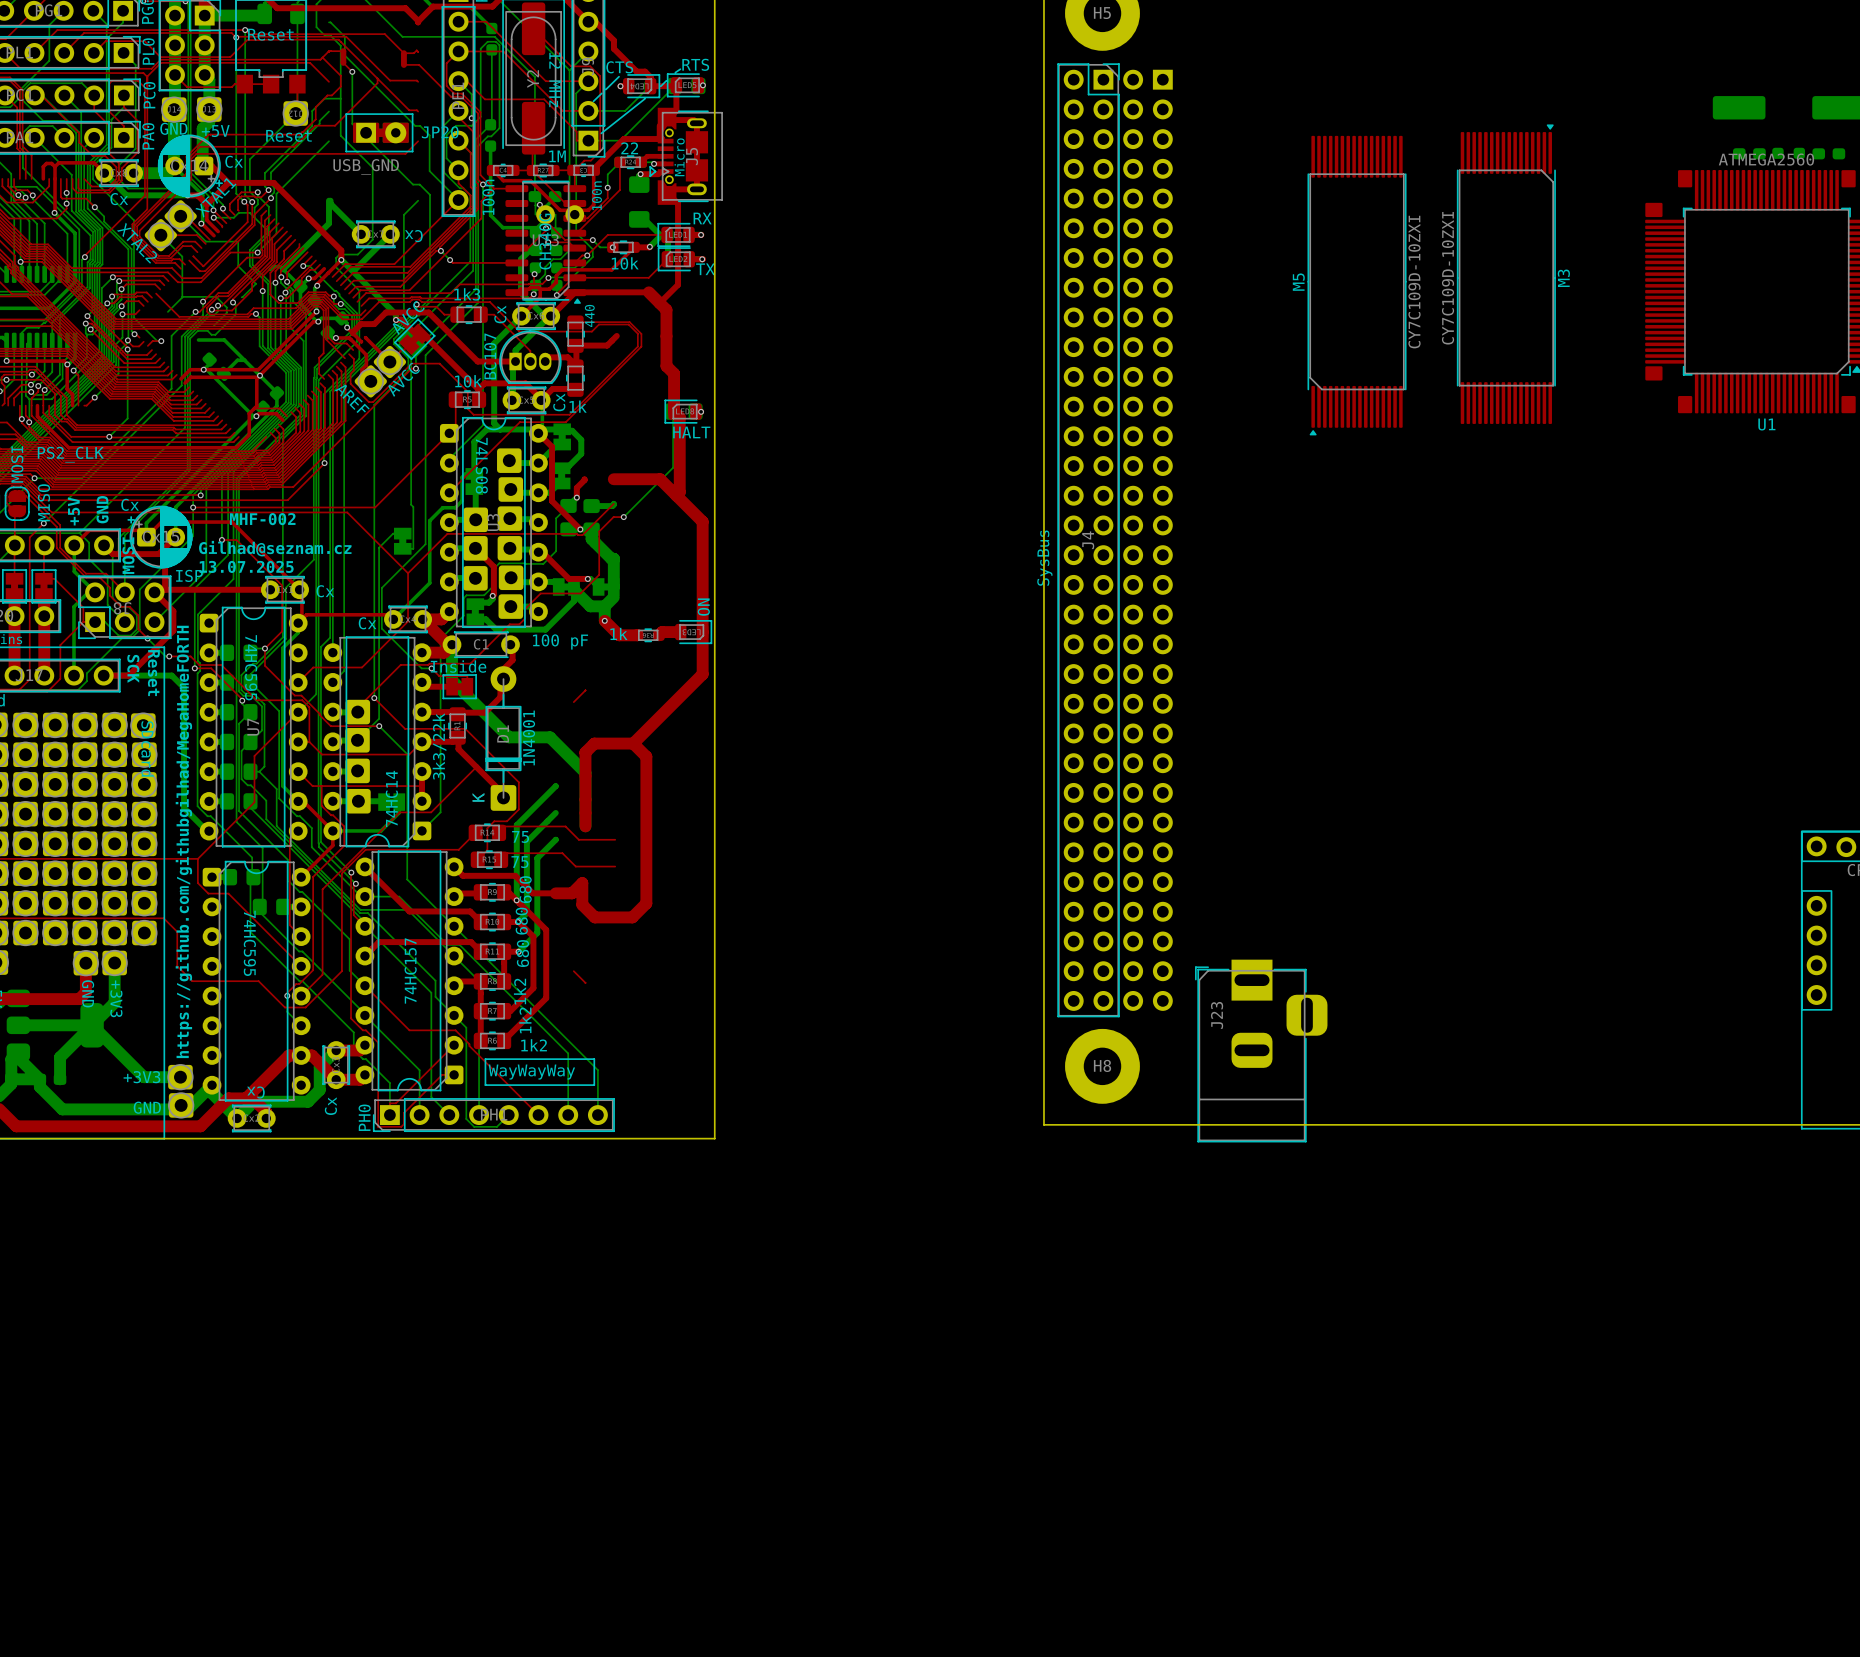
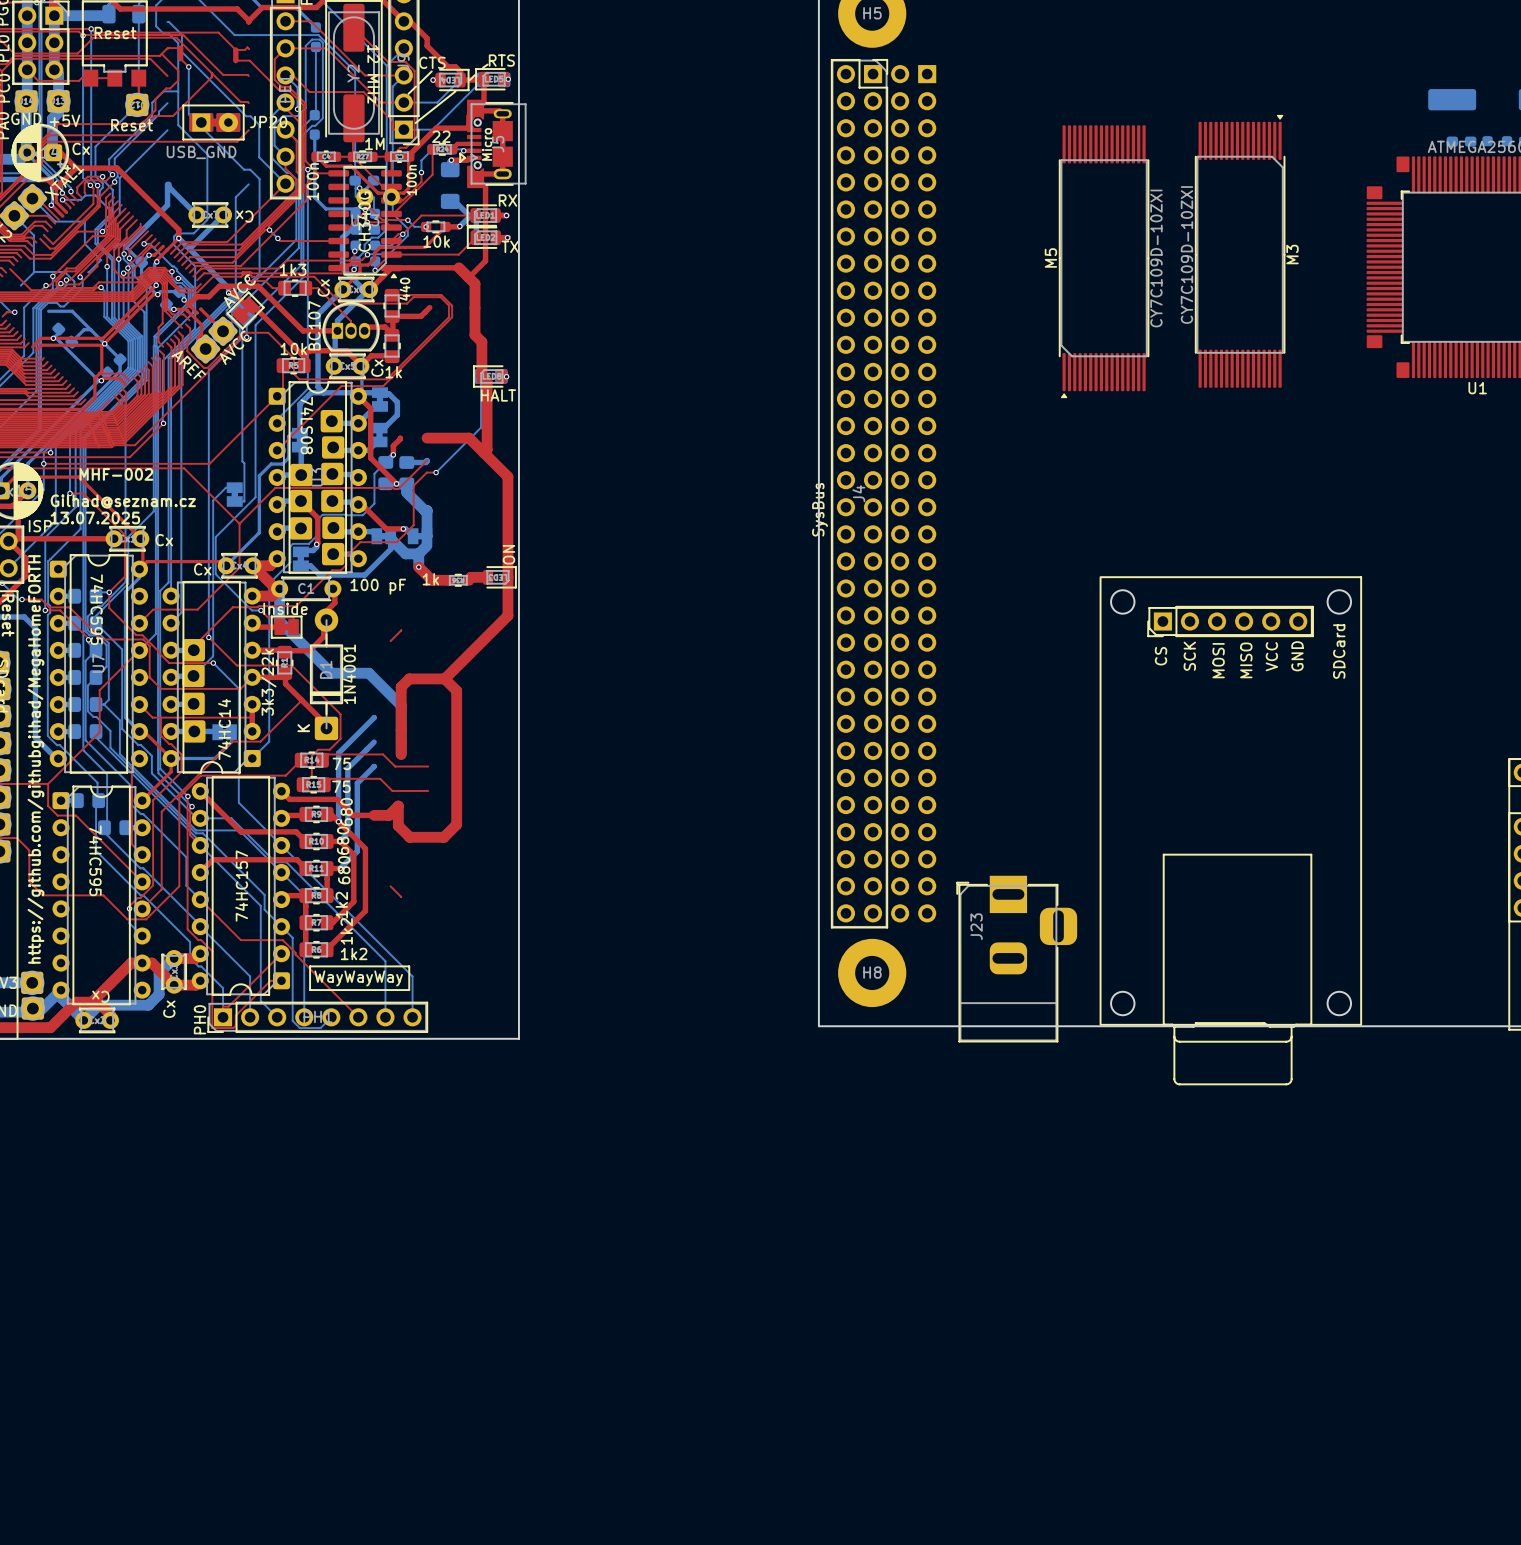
part: none -> SDCard (1230, 830)

